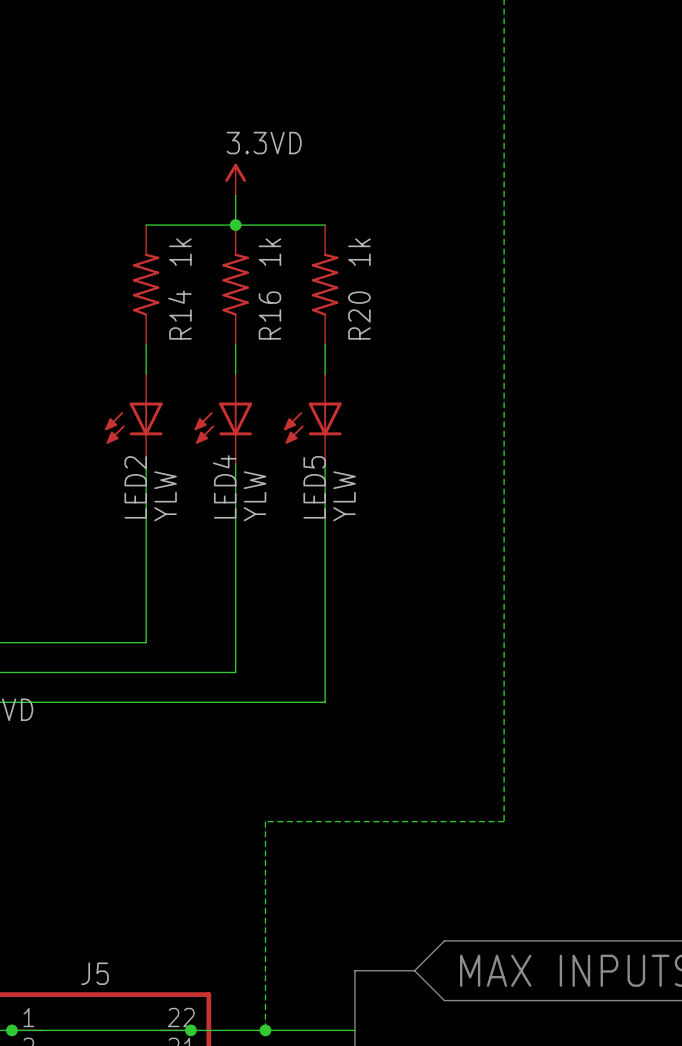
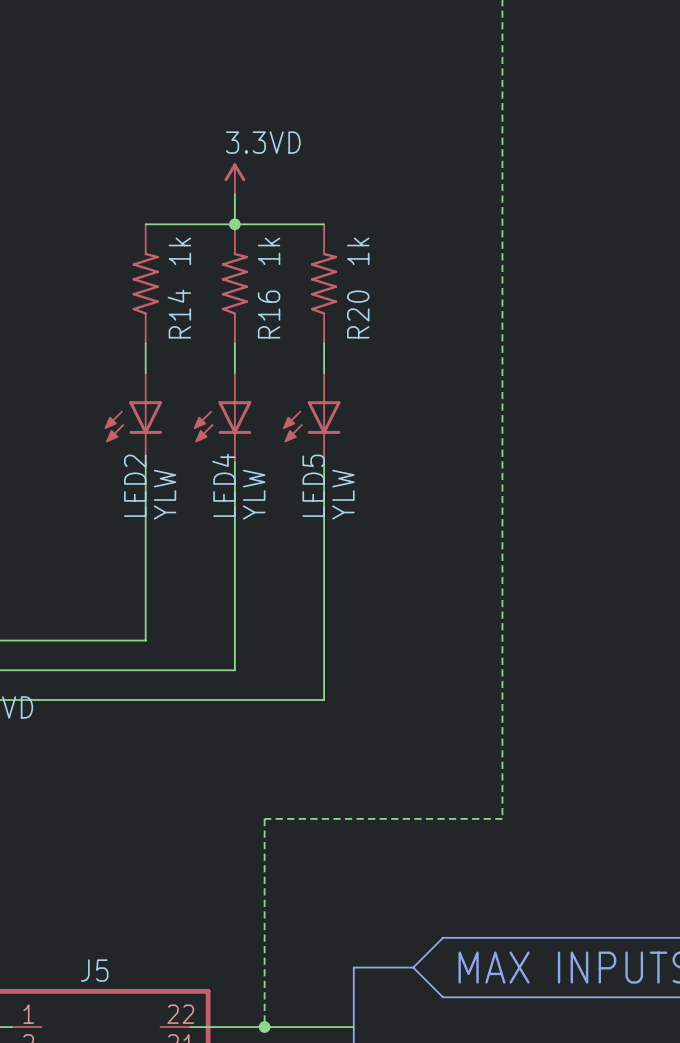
wire: (11, 1030) (190, 1030) -> none
junction: (11, 1030) -> none
junction: (190, 1030) -> none

